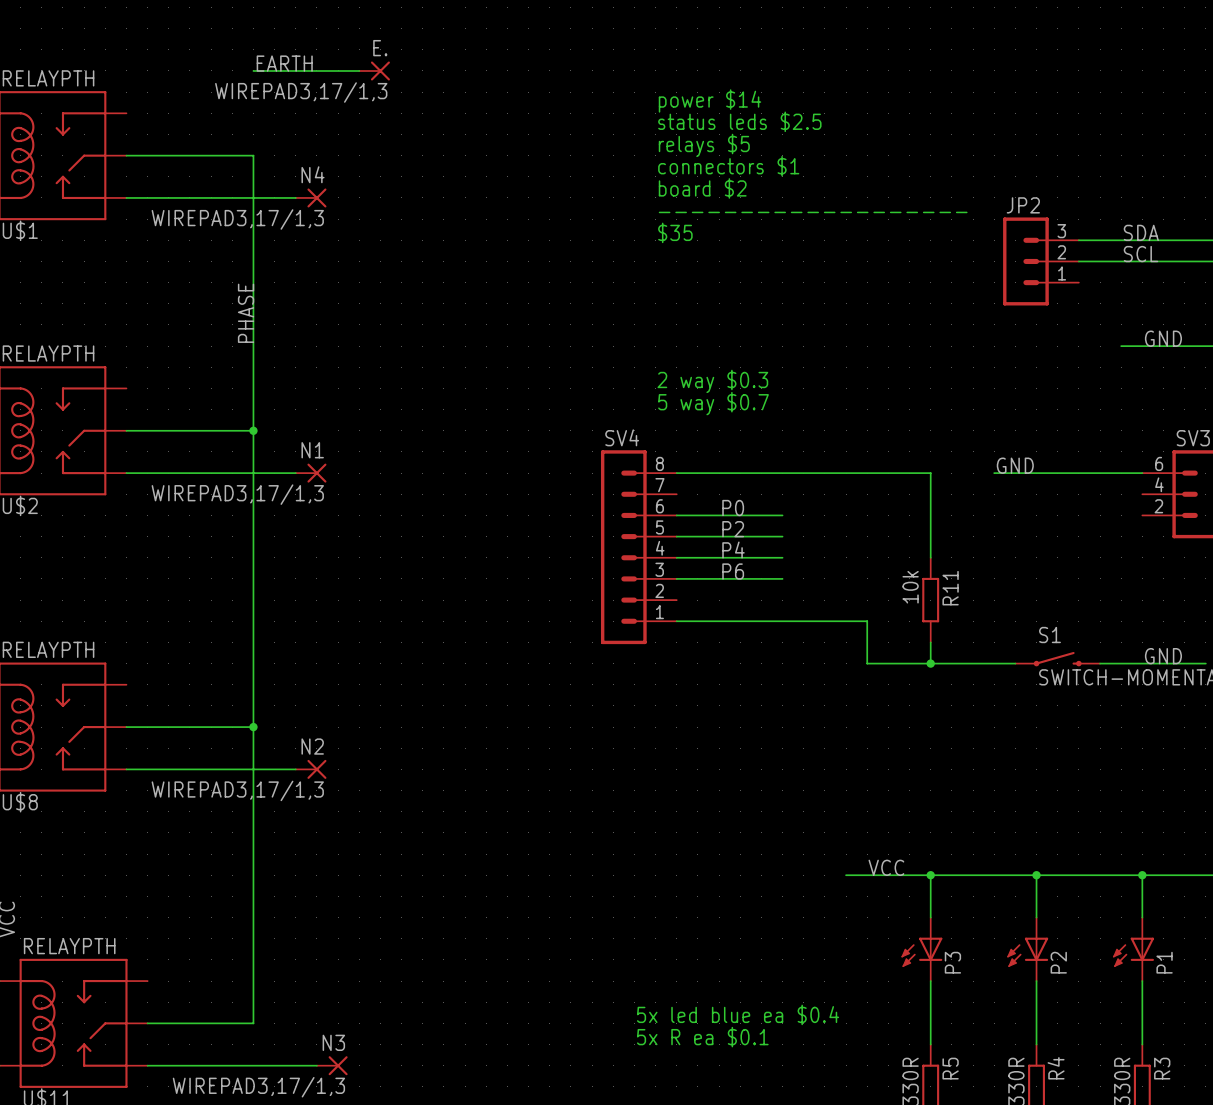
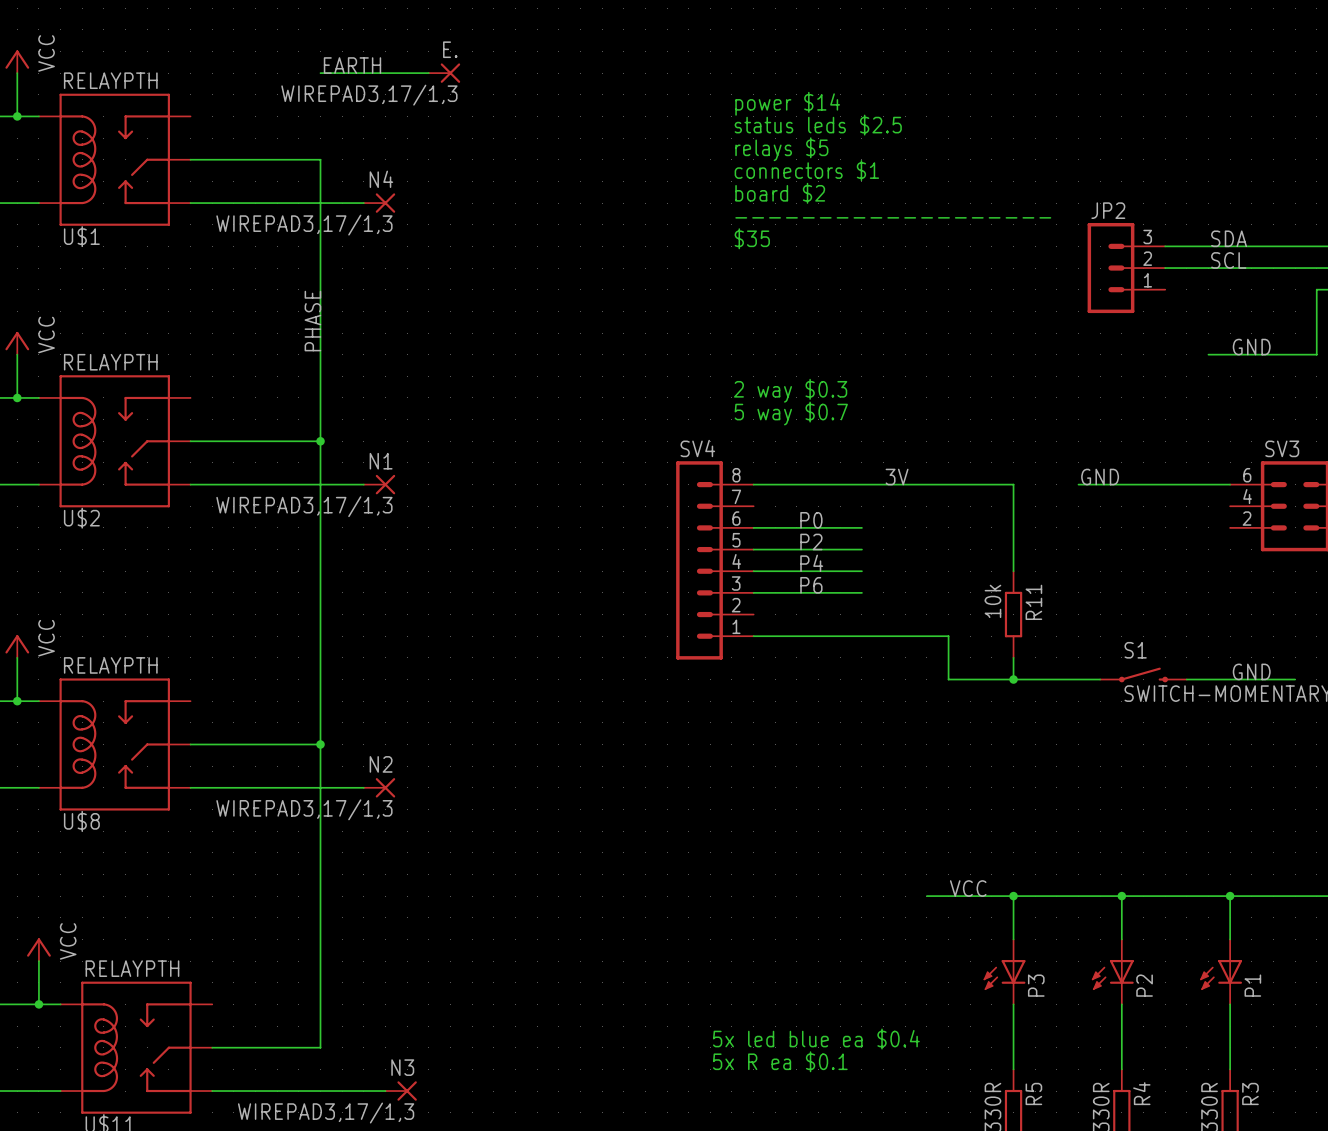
label: none -> 3V (897, 477)

